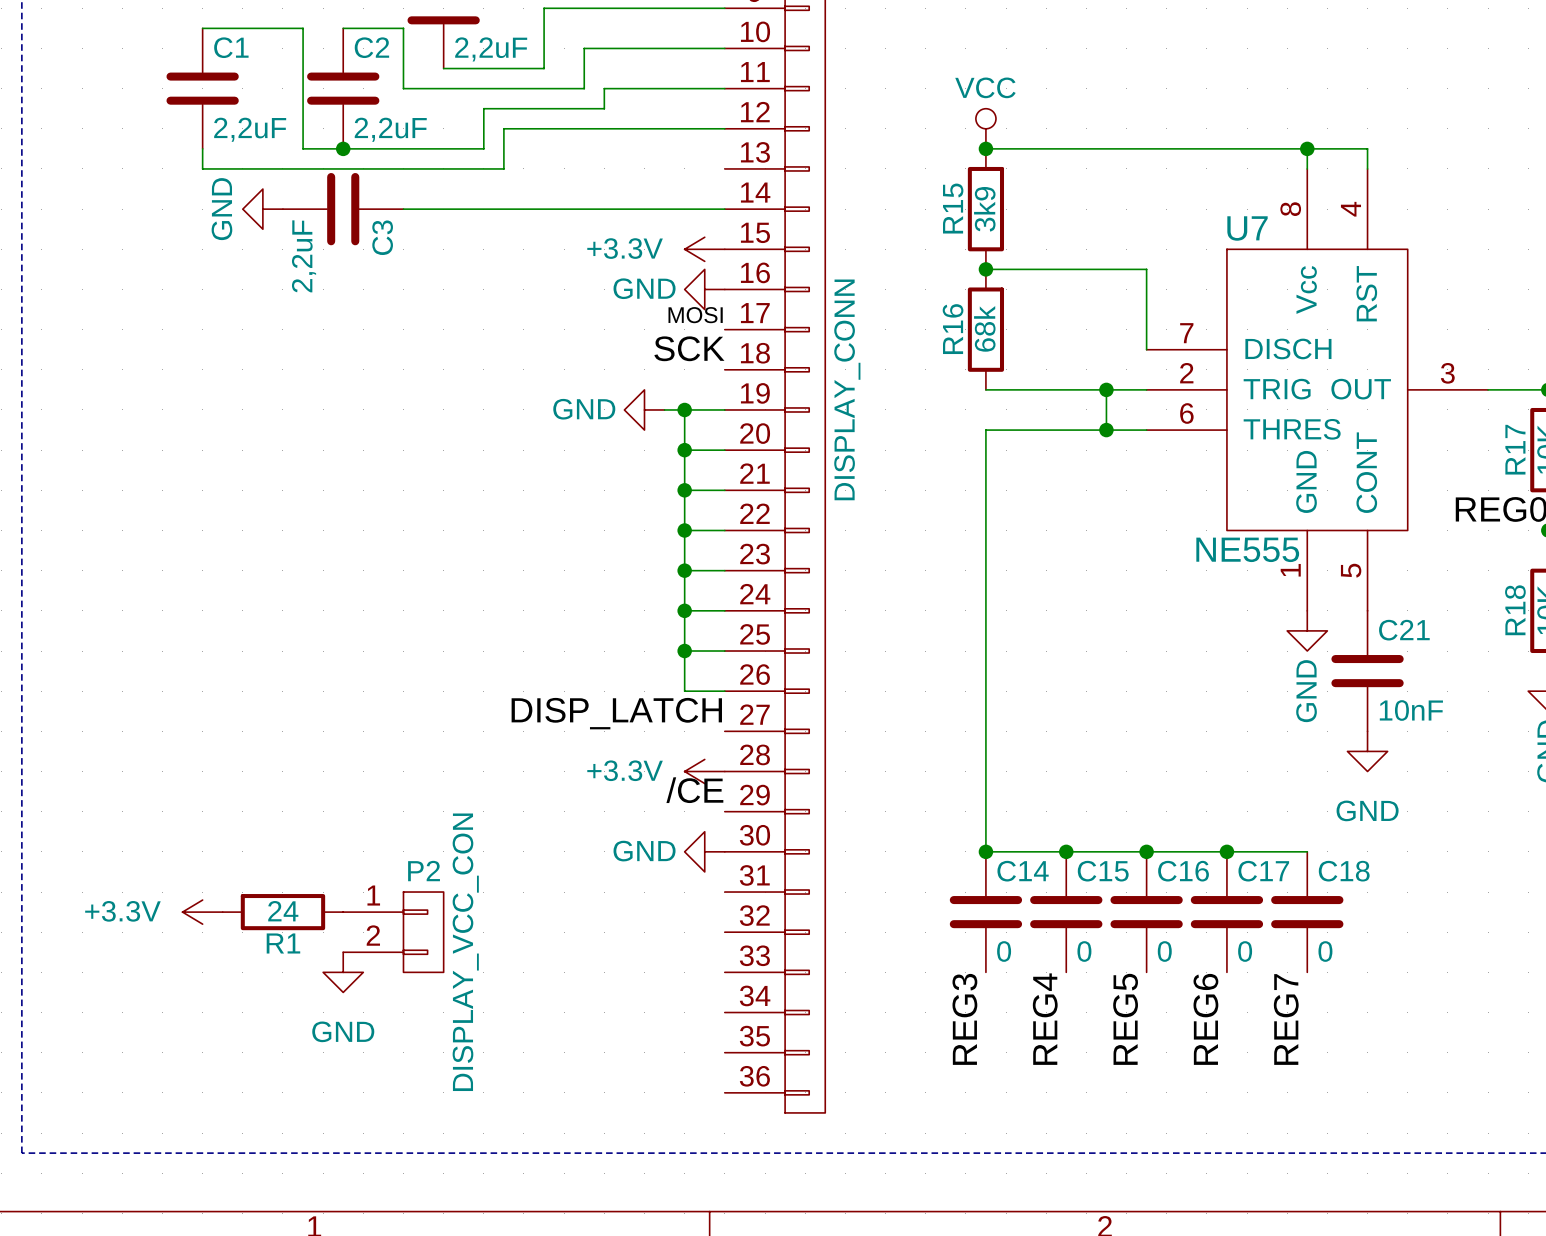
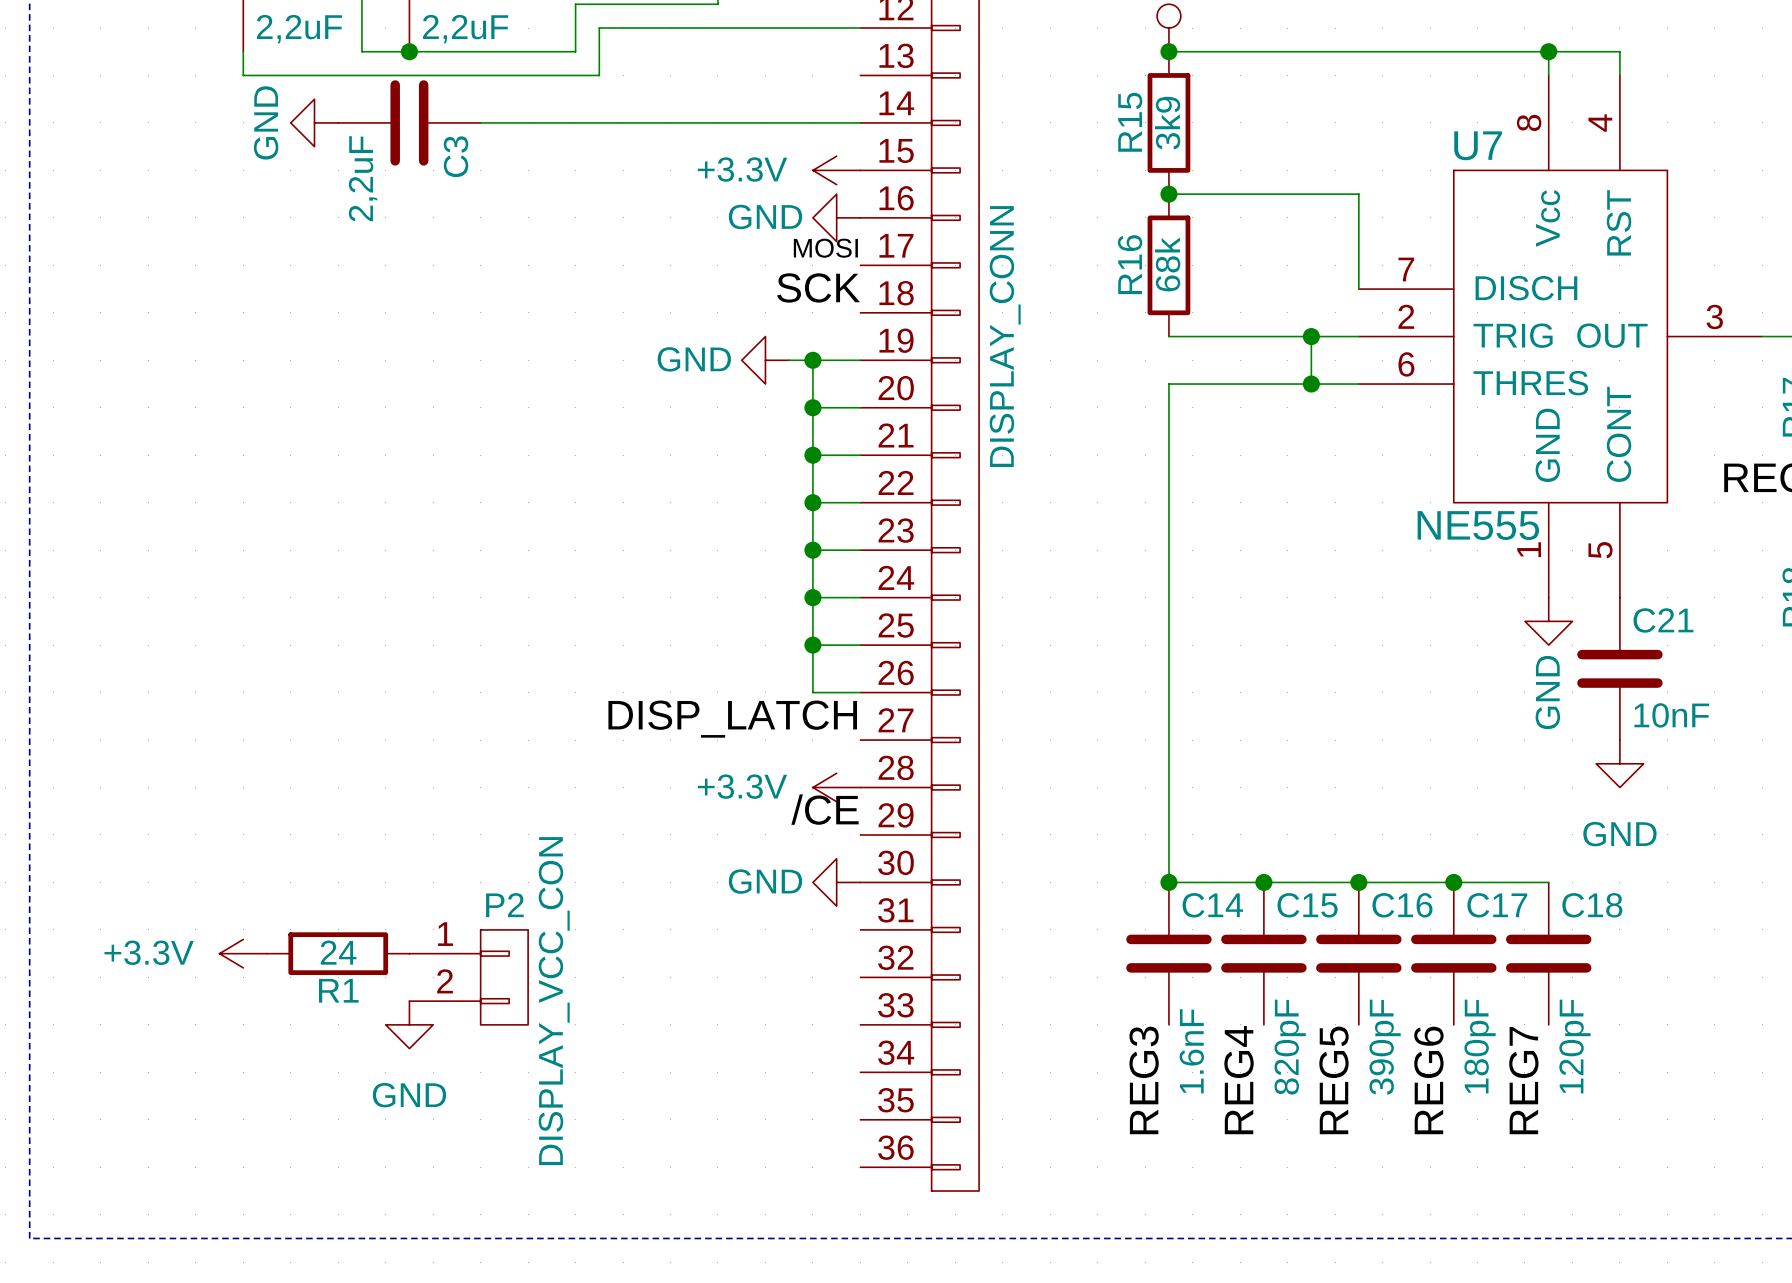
C14 value: 0 (1004, 951) -> 1.6nF (1191, 1051)
C15 value: 0 (1084, 951) -> 820pF (1290, 1047)
C16 value: 0 (1164, 951) -> 390pF (1385, 1047)
C17 value: 0 (1245, 951) -> 180pF (1480, 1046)
C18 value: 0 (1325, 951) -> 120pF (1574, 1046)

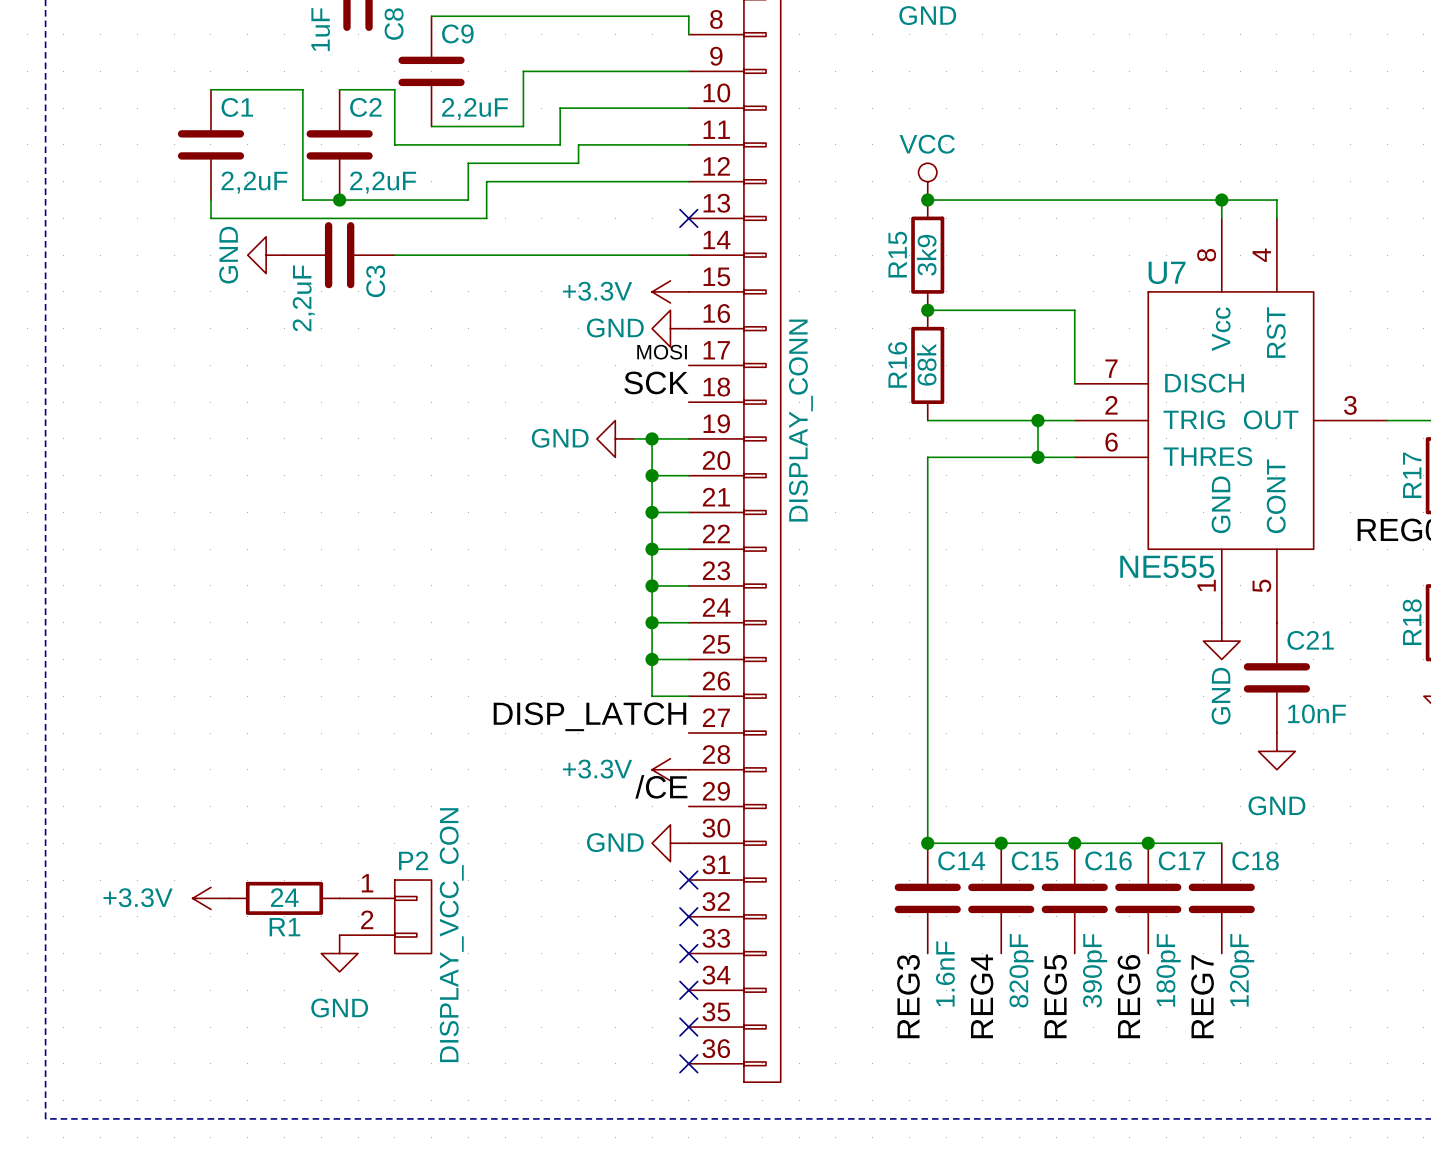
no-connect mark: none -> (688, 218)
no-connect mark: none -> (688, 880)
no-connect mark: none -> (688, 916)
no-connect mark: none -> (688, 953)
no-connect mark: none -> (688, 990)
no-connect mark: none -> (688, 1027)
no-connect mark: none -> (688, 1063)

